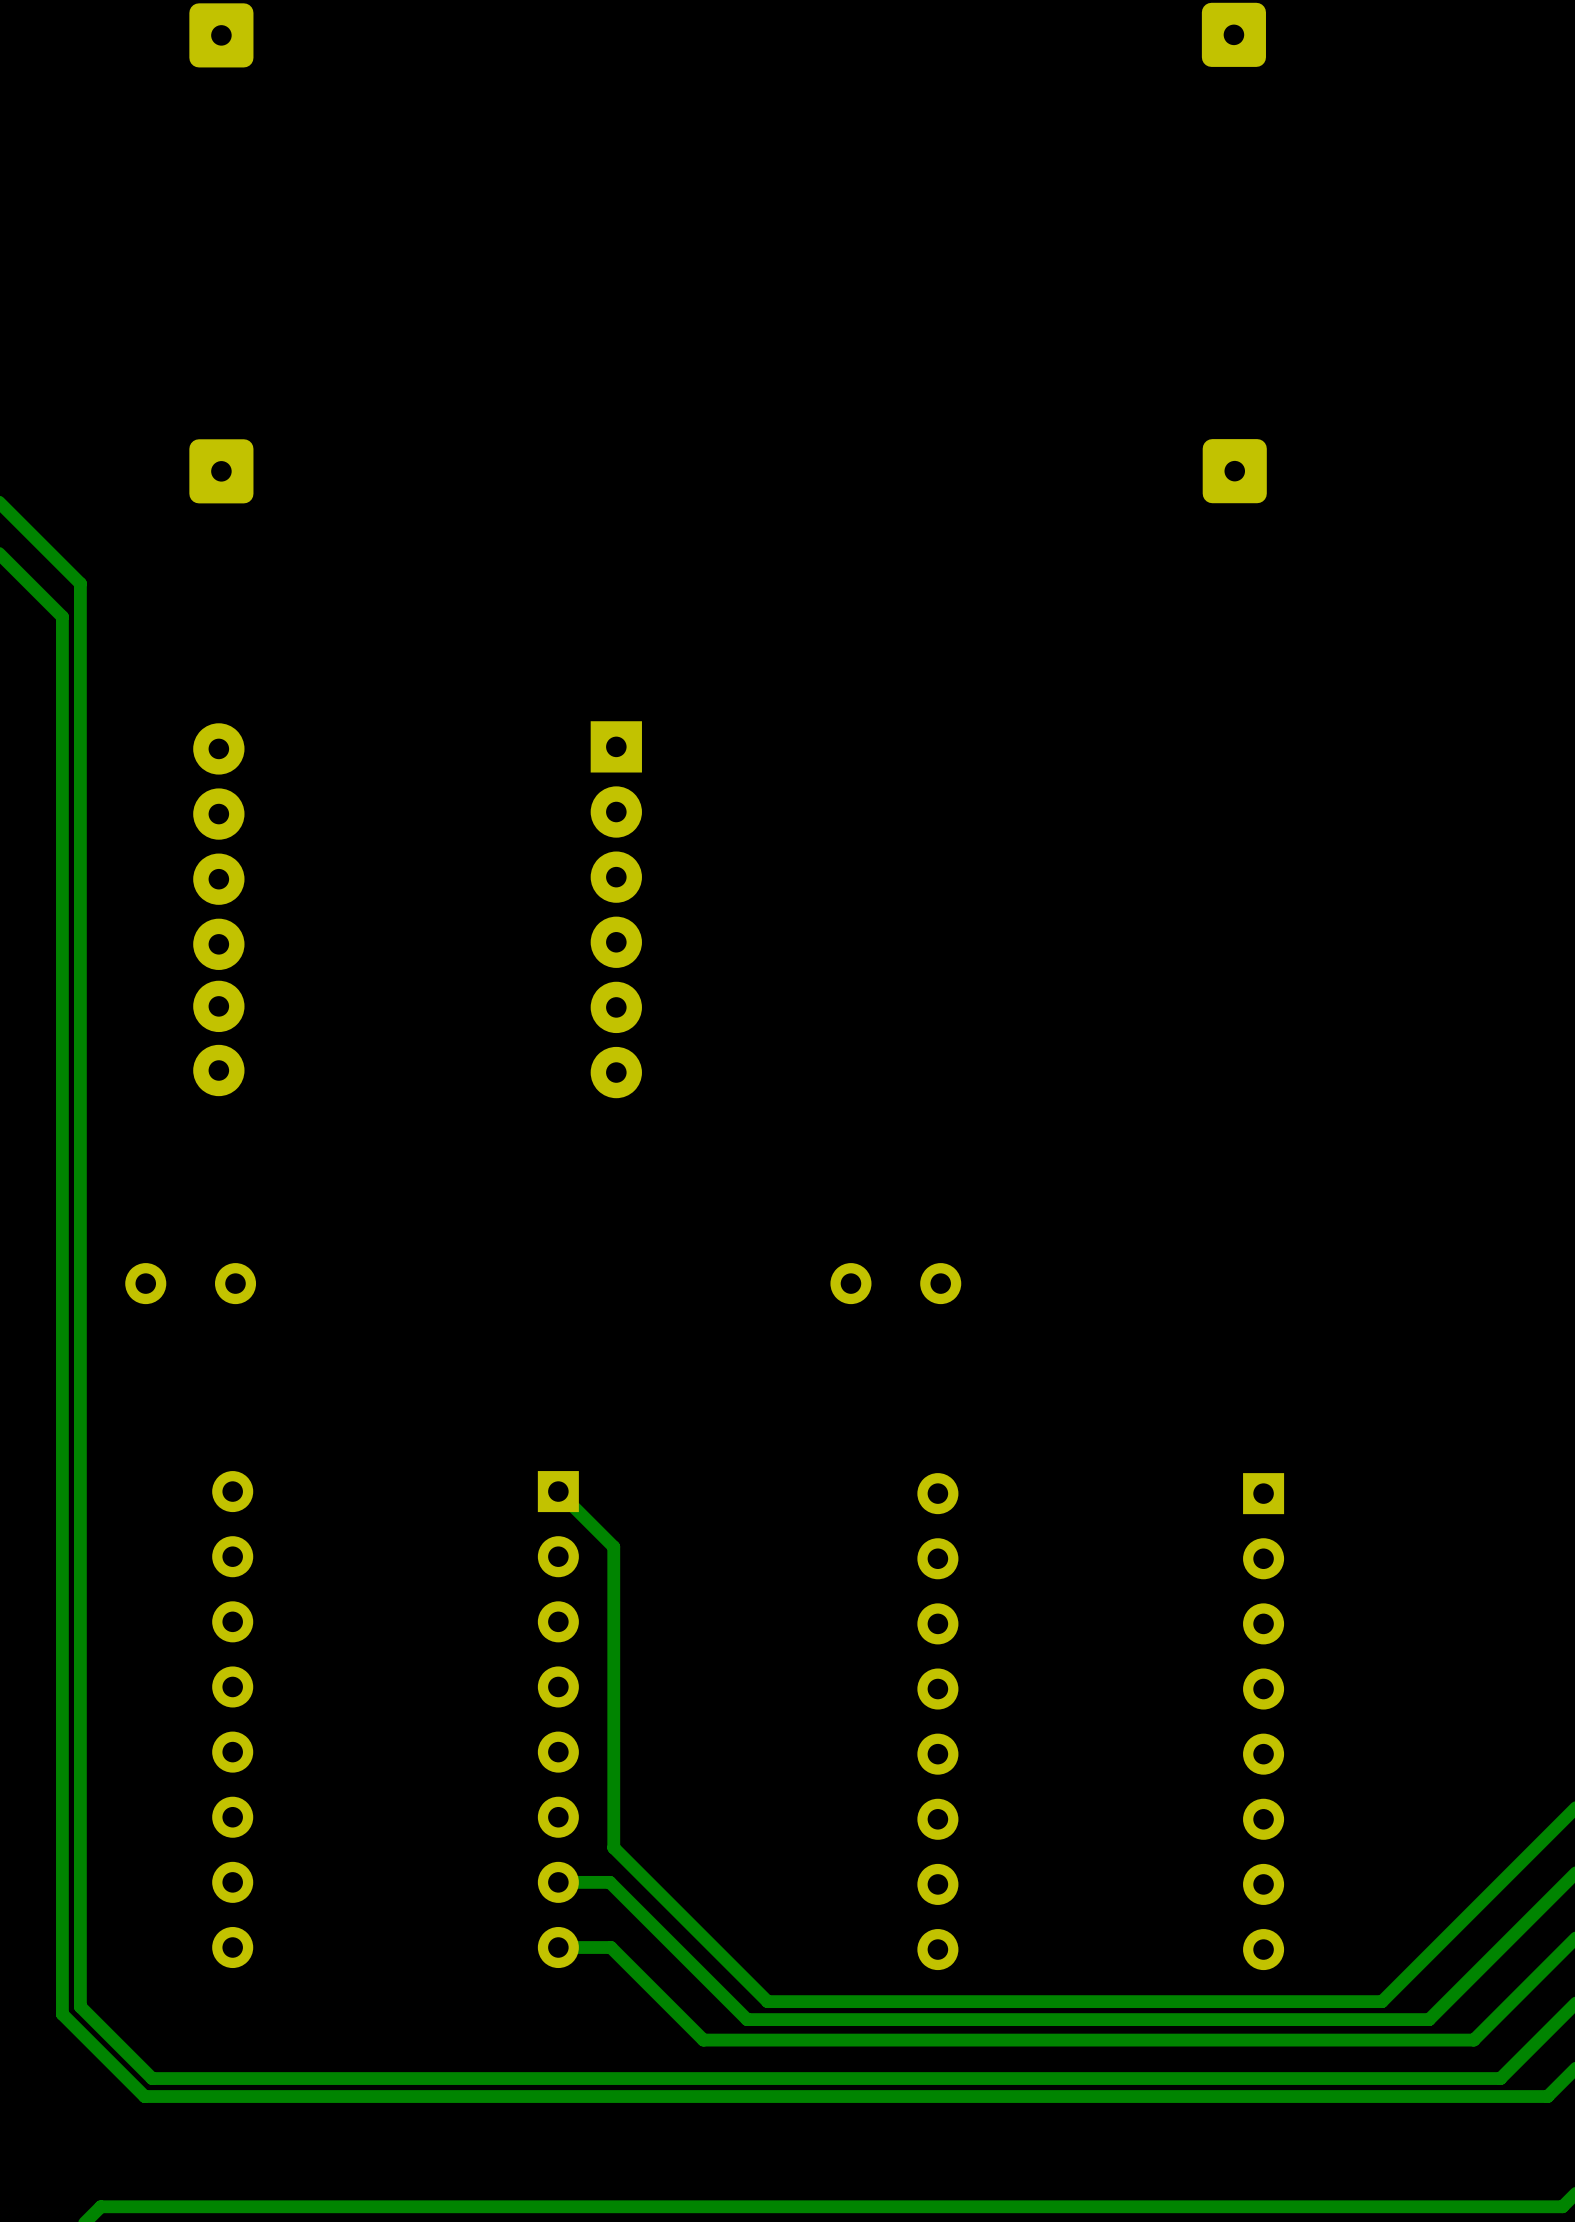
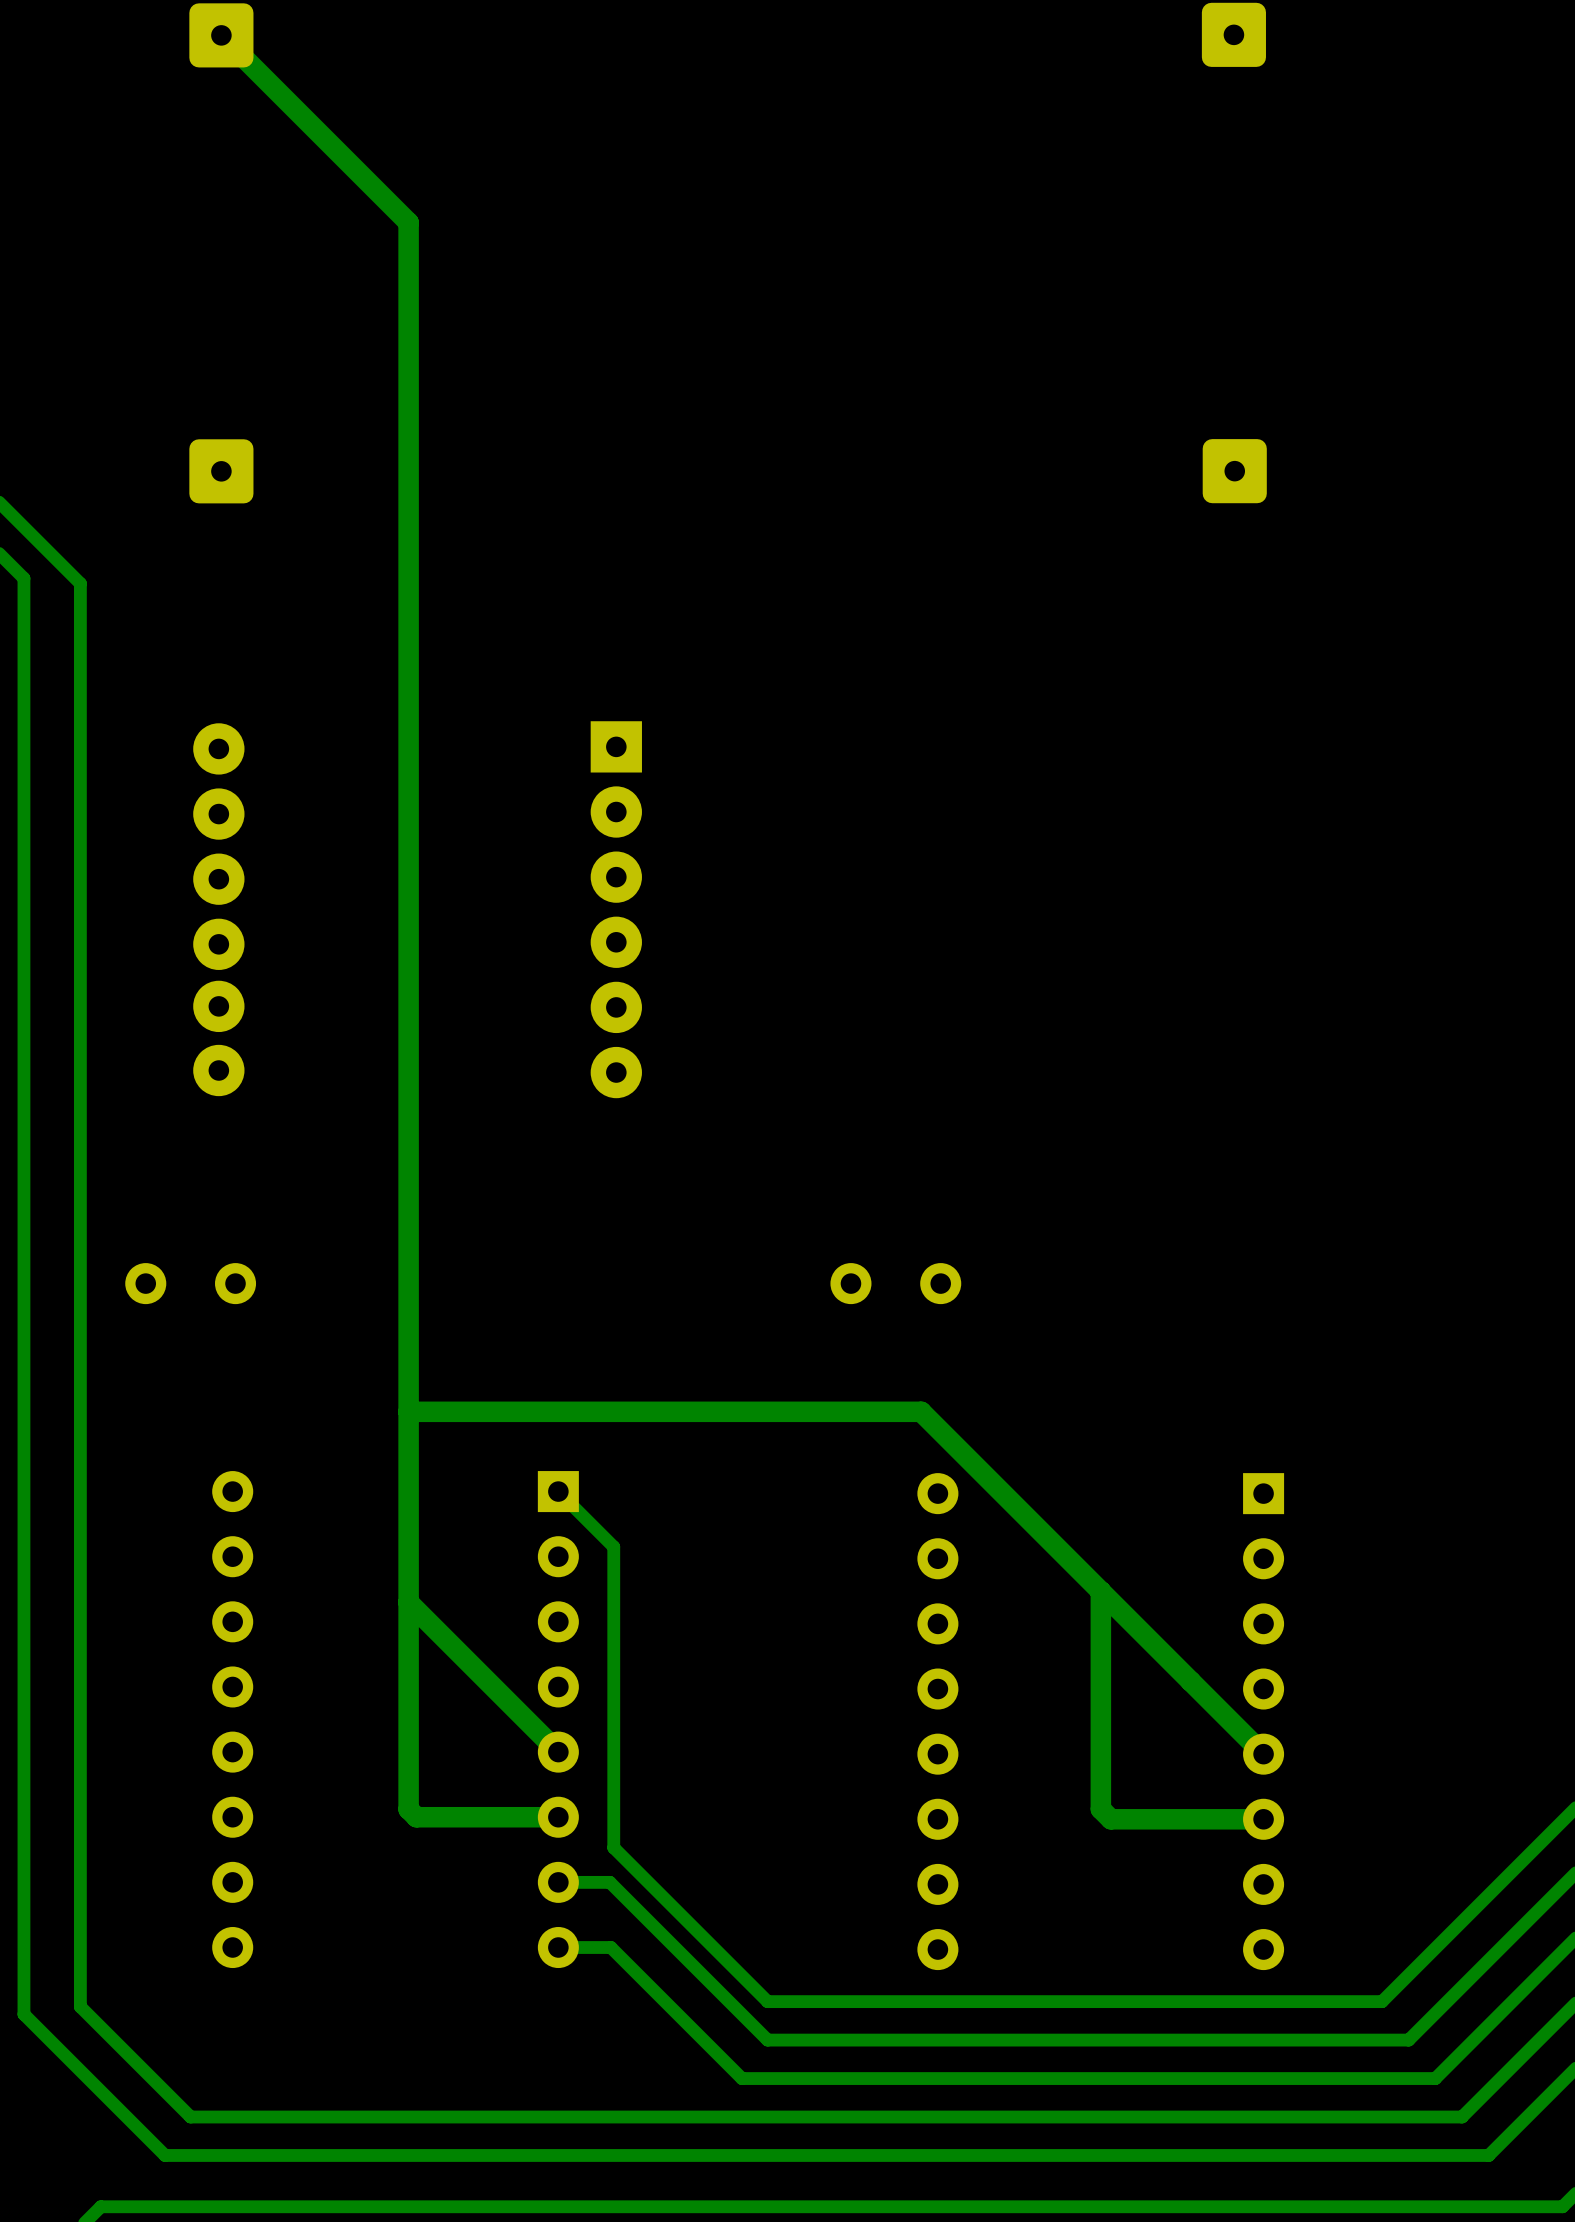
track: none -> (221, 35) (408, 222) (408, 1809) (416, 1817) (558, 1817)
track: (23, 578) (62, 616) (62, 2014) (144, 2096) (1547, 2096) -> (23, 578) (23, 2014) (165, 2155) (1488, 2155) (1547, 2096)
track: none -> (408, 1411) (921, 1411) (1263, 1754)
track: none -> (1100, 1591) (1100, 1809) (1110, 1819) (1263, 1819)
track: none -> (408, 1602) (558, 1752)
track: (1429, 2019) (747, 2019) -> (767, 2040) (747, 2019)
track: none -> (1429, 2019) (1408, 2040)
track: (767, 2040) (703, 2040) -> (741, 2078) (703, 2040)
track: (1473, 2040) (1408, 2040) -> (1473, 2040) (1435, 2078)
track: (741, 2078) (152, 2078) -> (1500, 2078) (1462, 2117) (190, 2117) (152, 2078)
track: (1500, 2078) (1435, 2078) -> none

